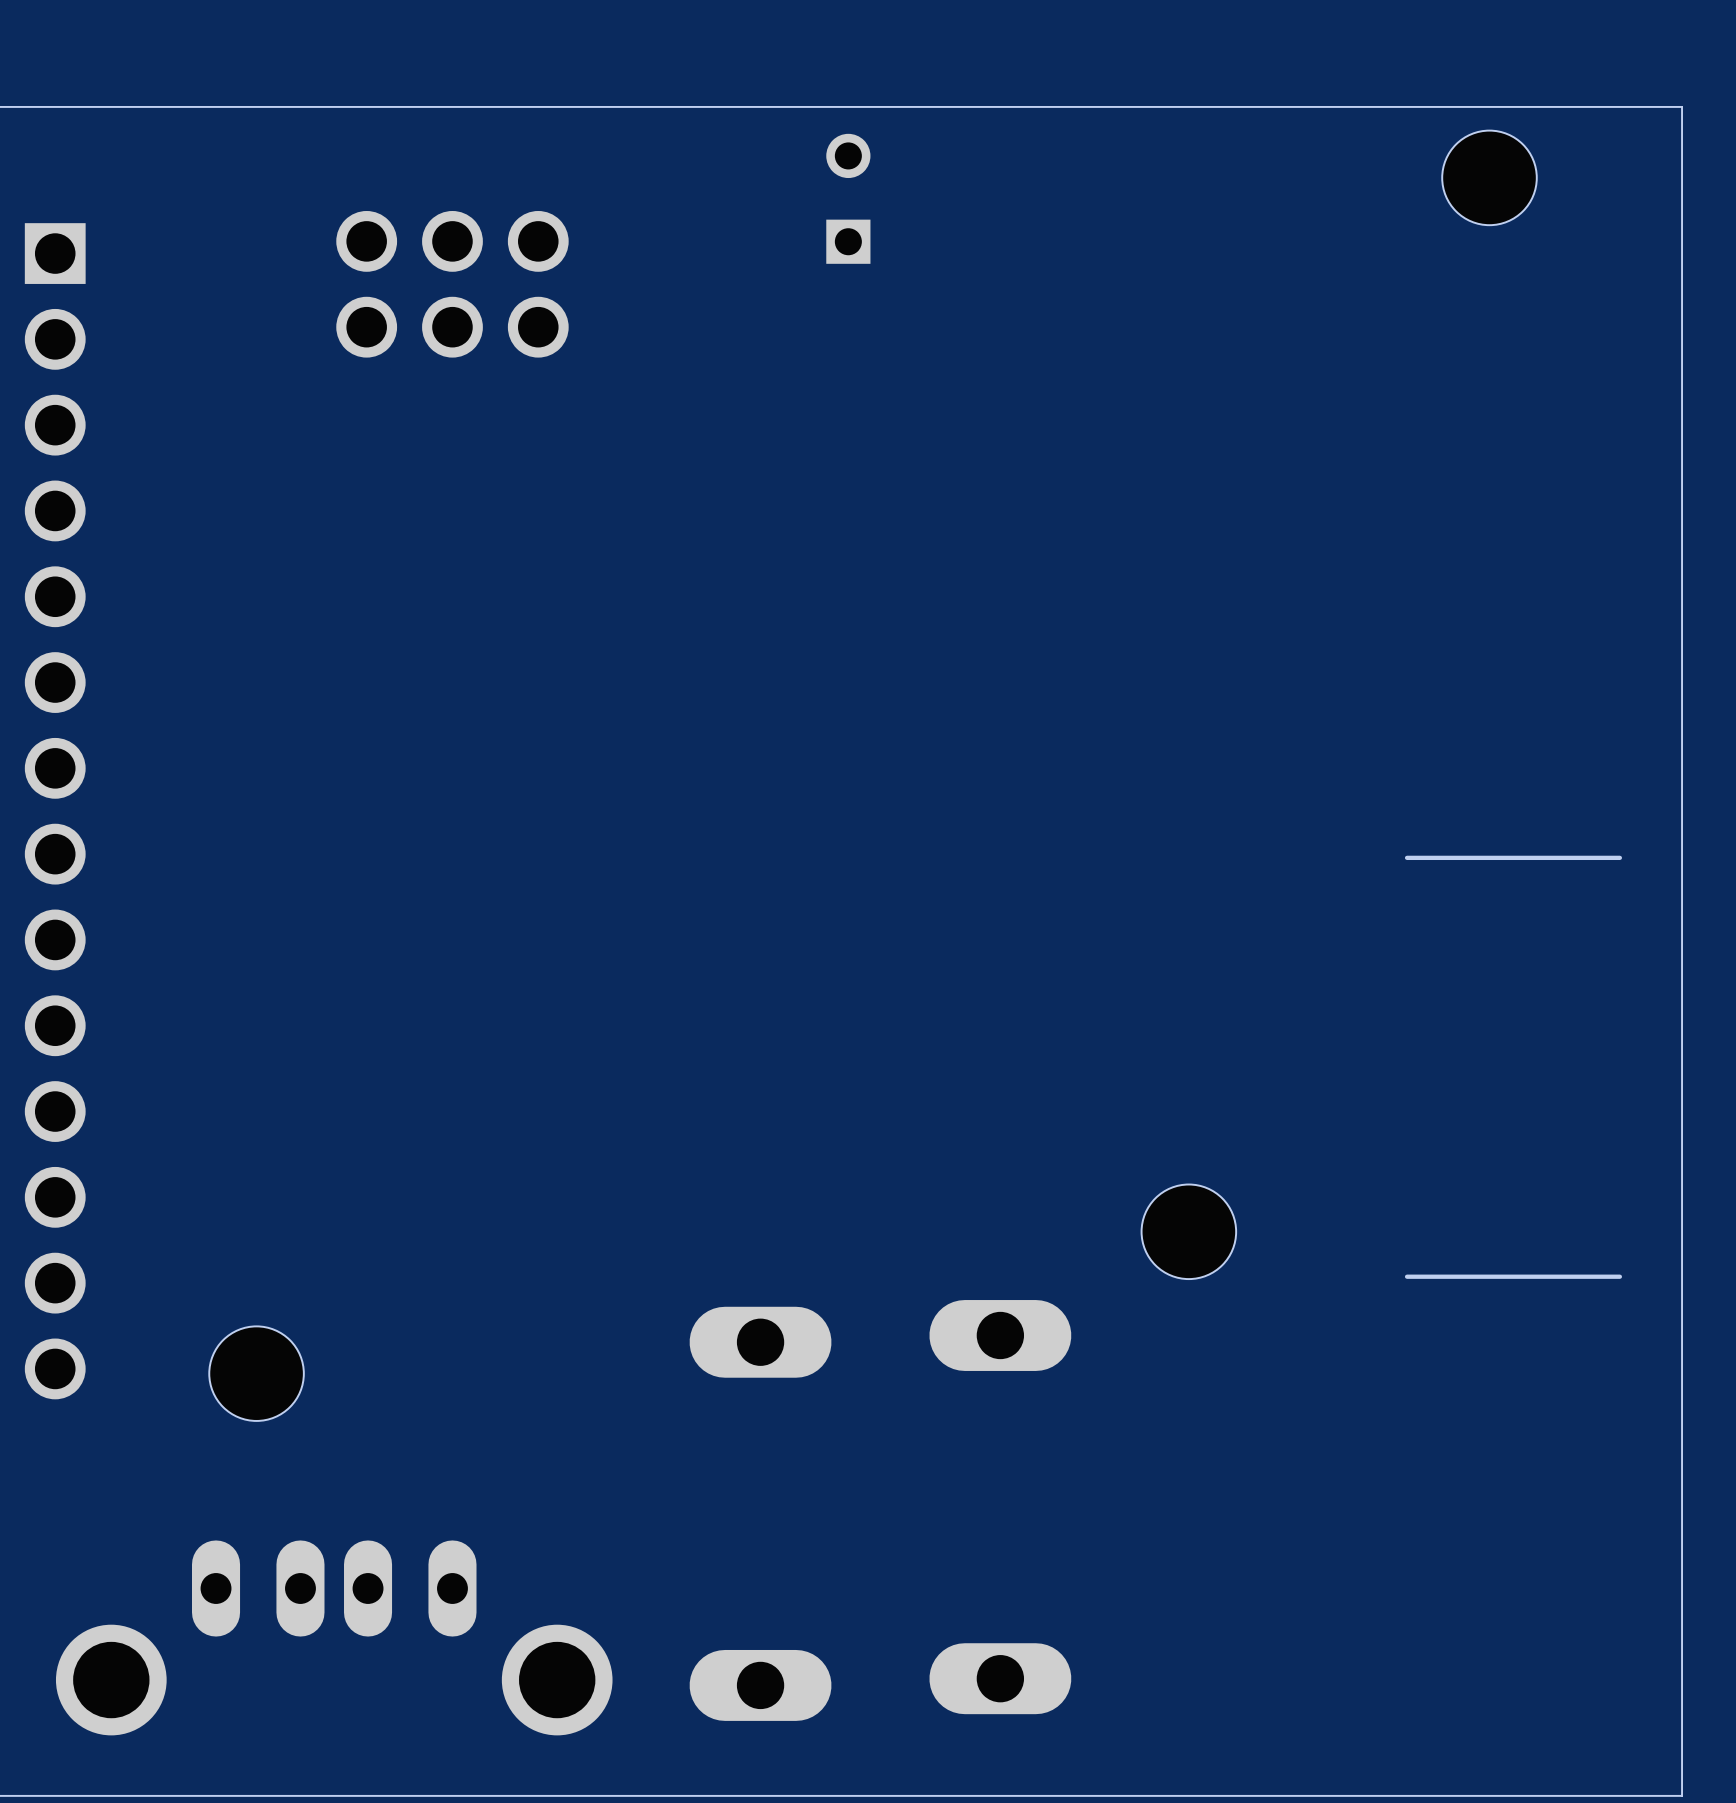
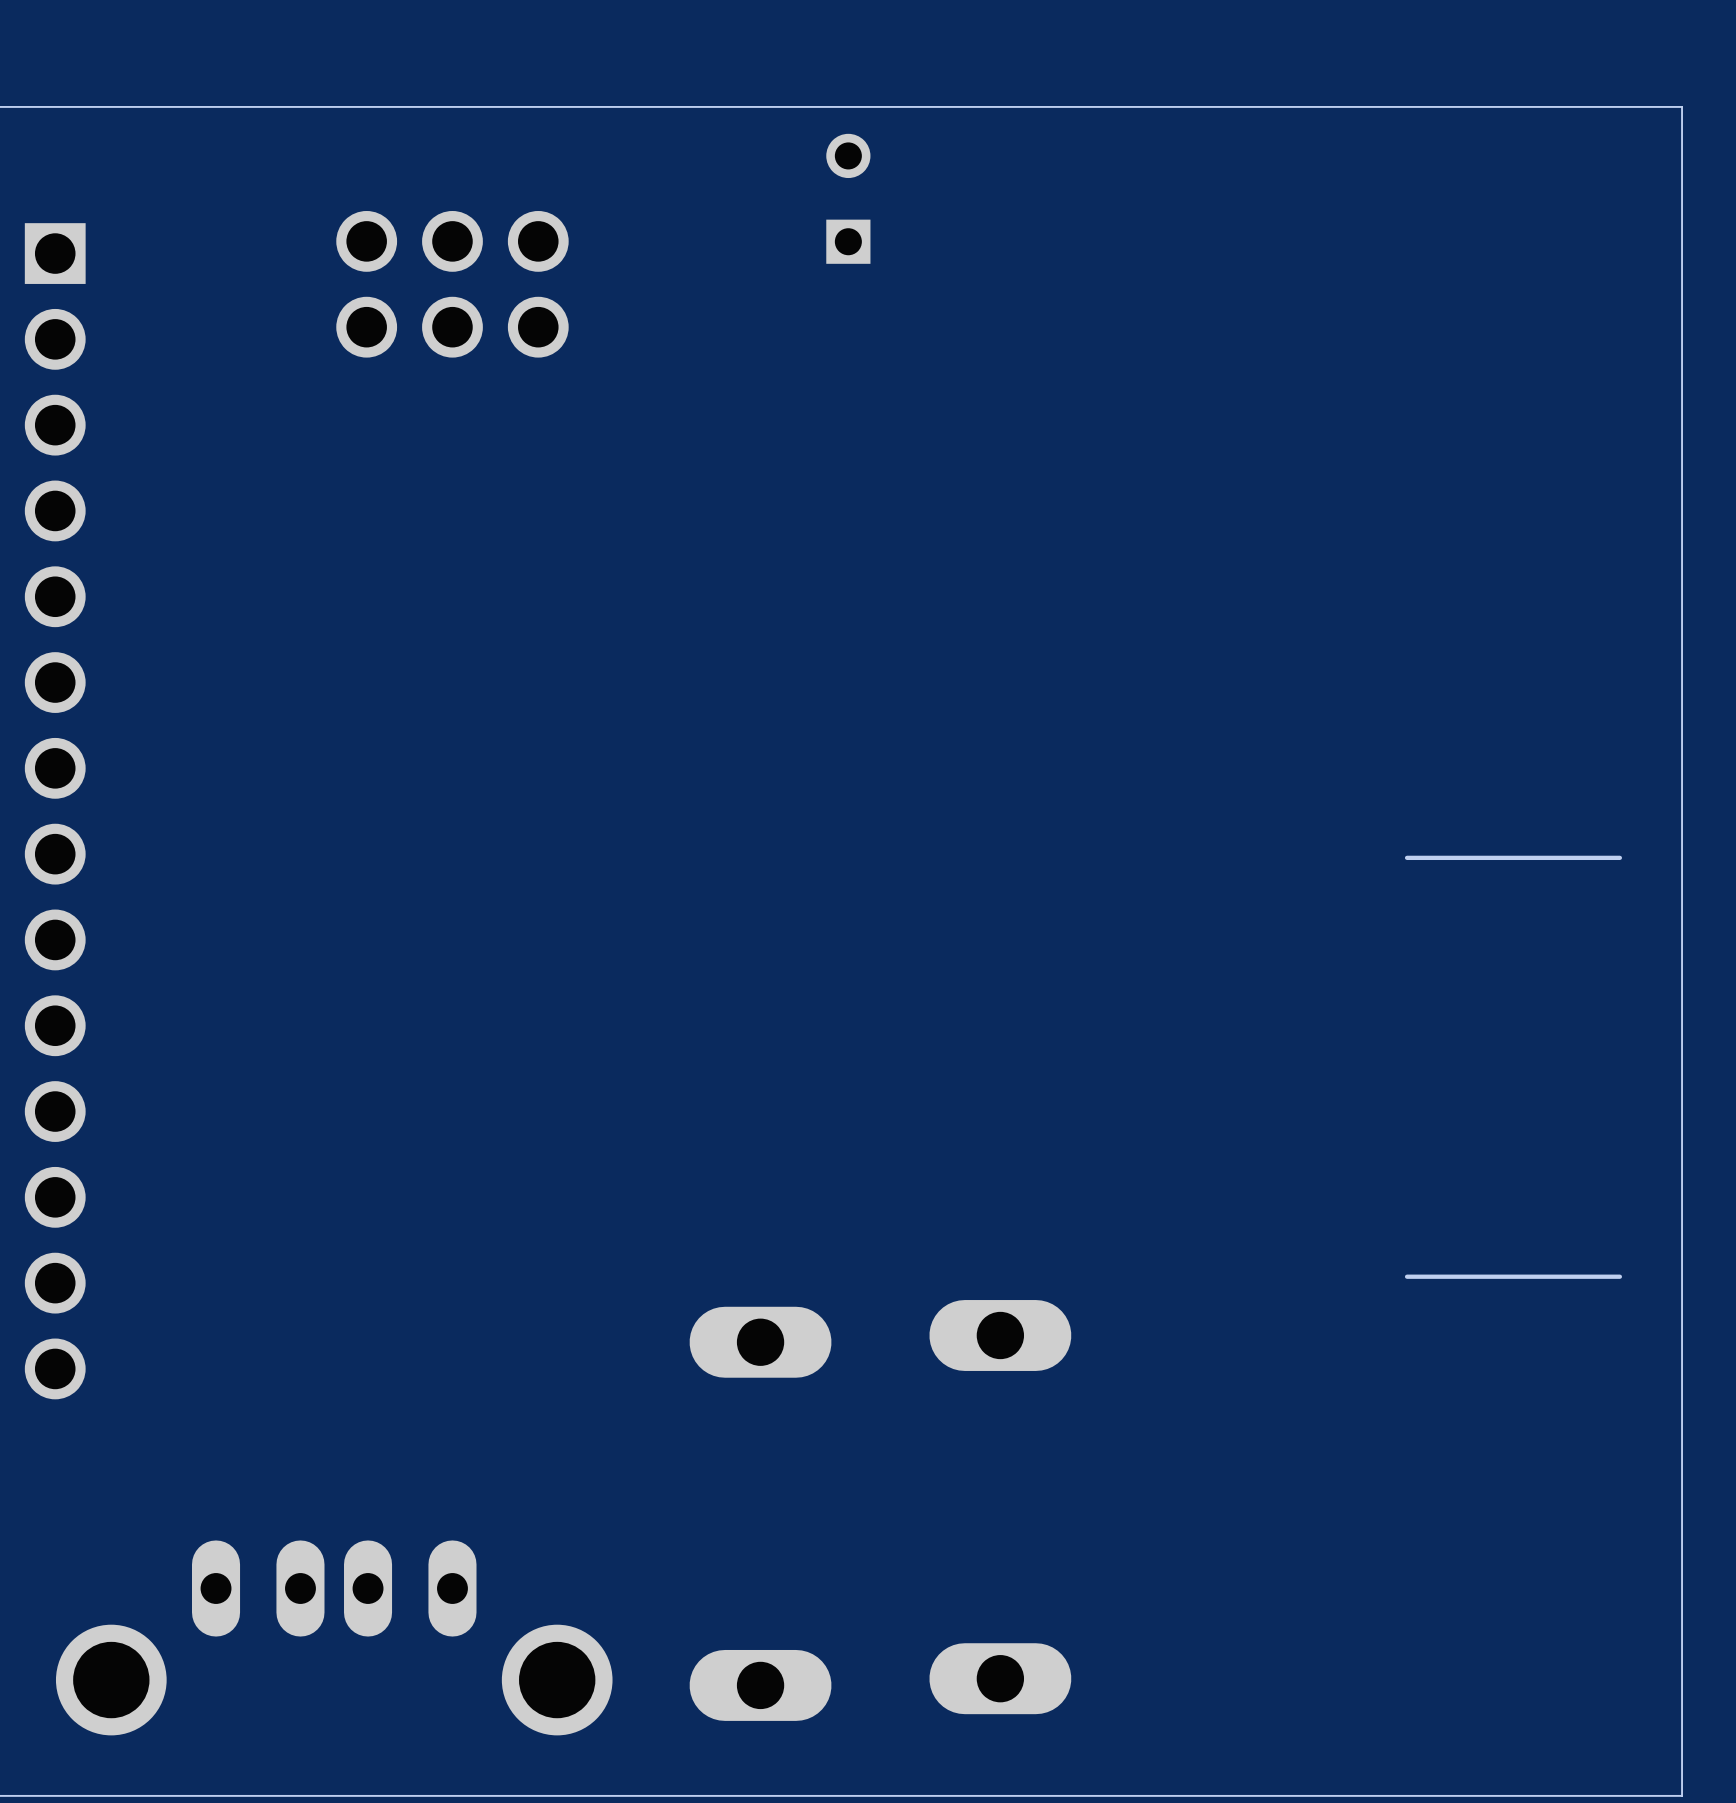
hole: (1489, 177) -> none
hole: (1188, 1231) -> none
hole: (256, 1373) -> none

